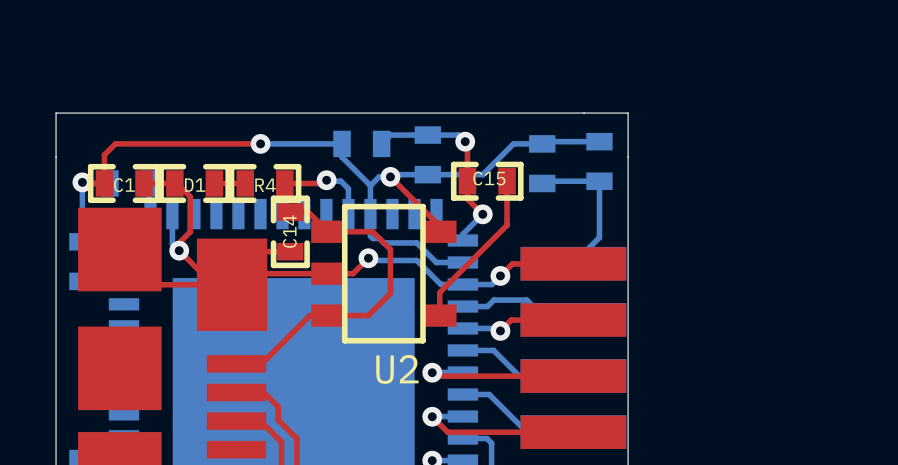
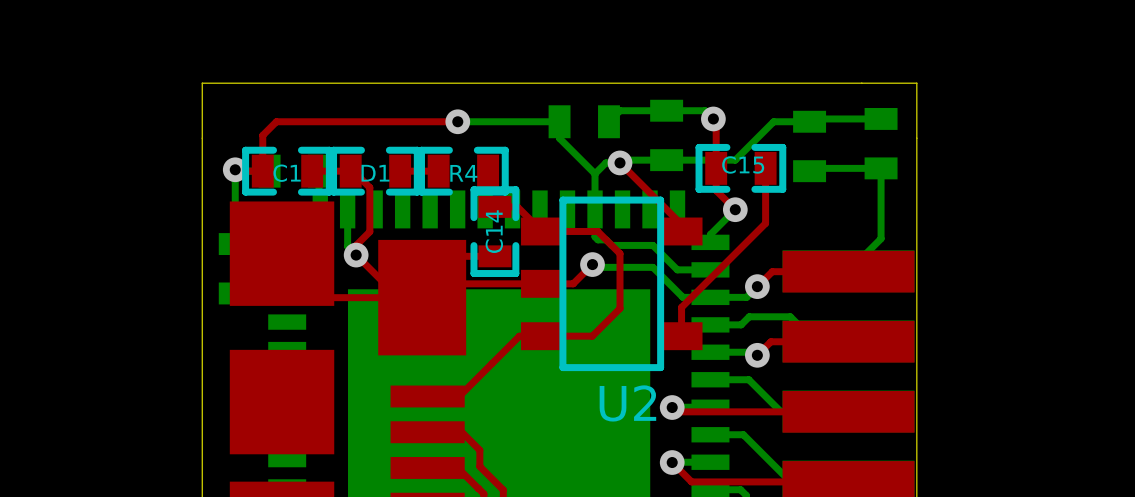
bottom track: (326, 180) (340, 181) (348, 188) (348, 214) -> none
top track: (326, 180) (323, 183) (284, 183) -> none
via: (326, 180) -> none

